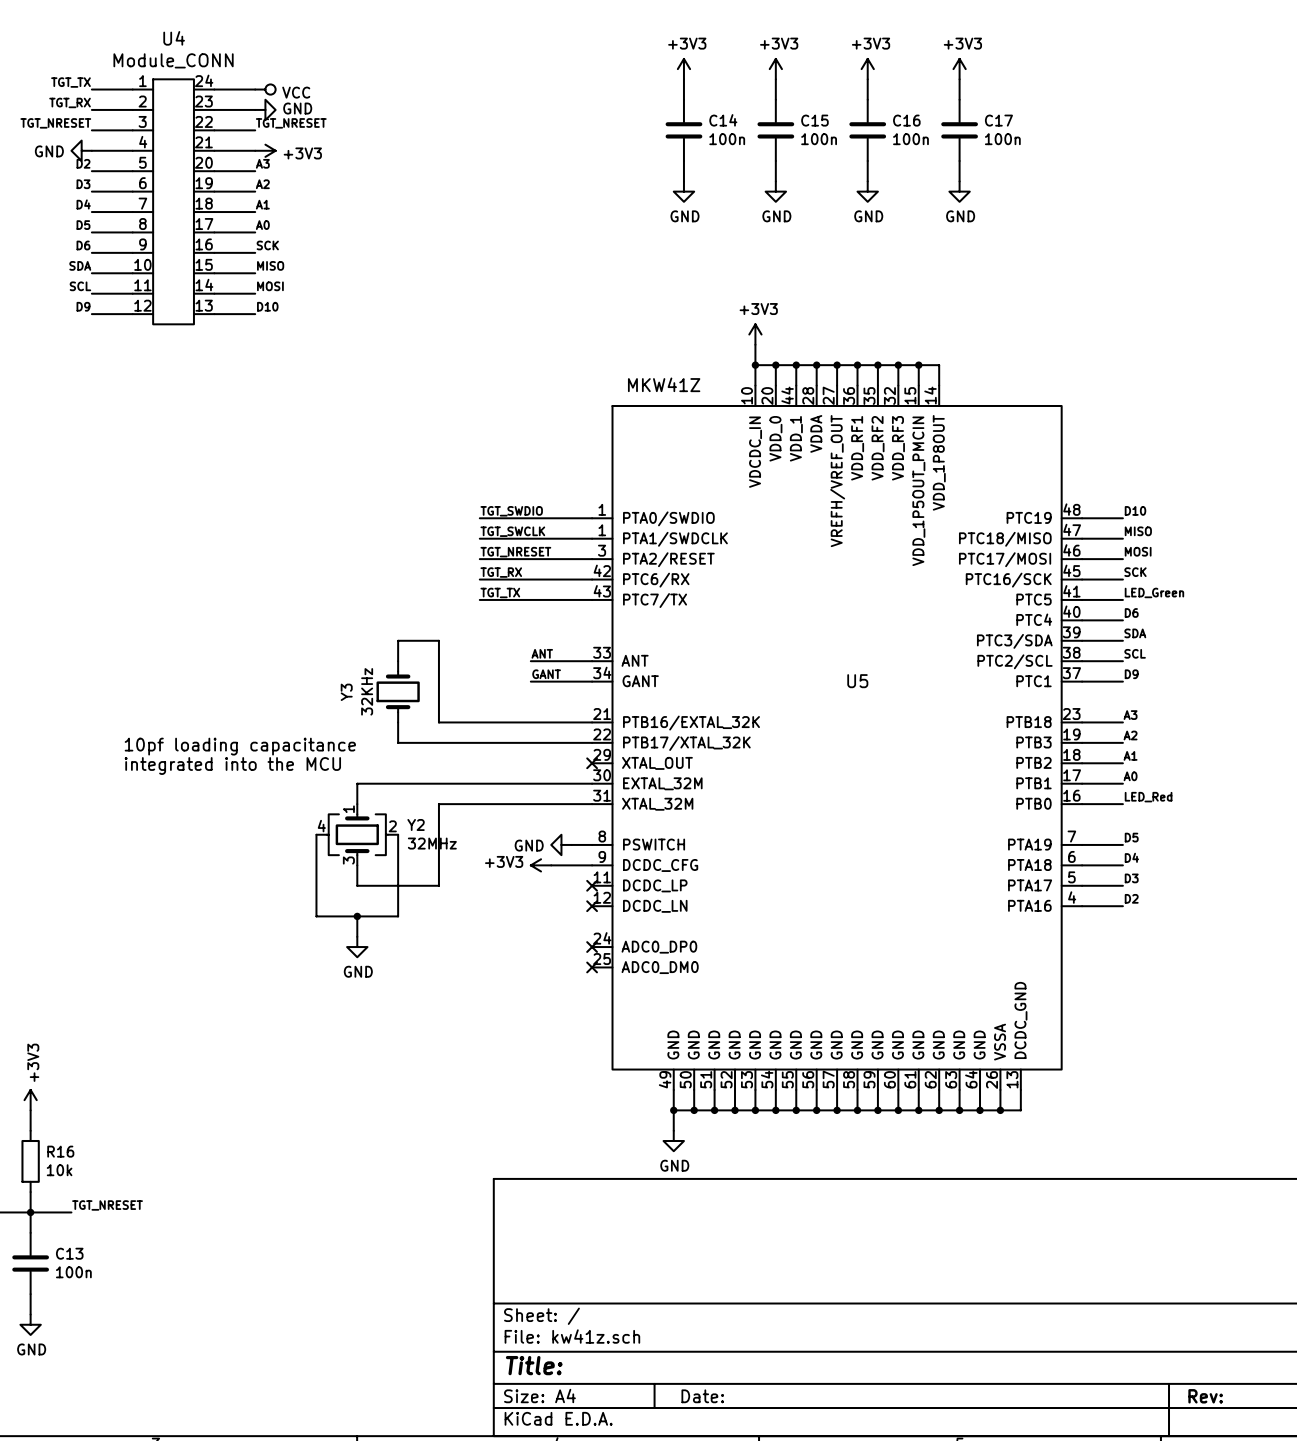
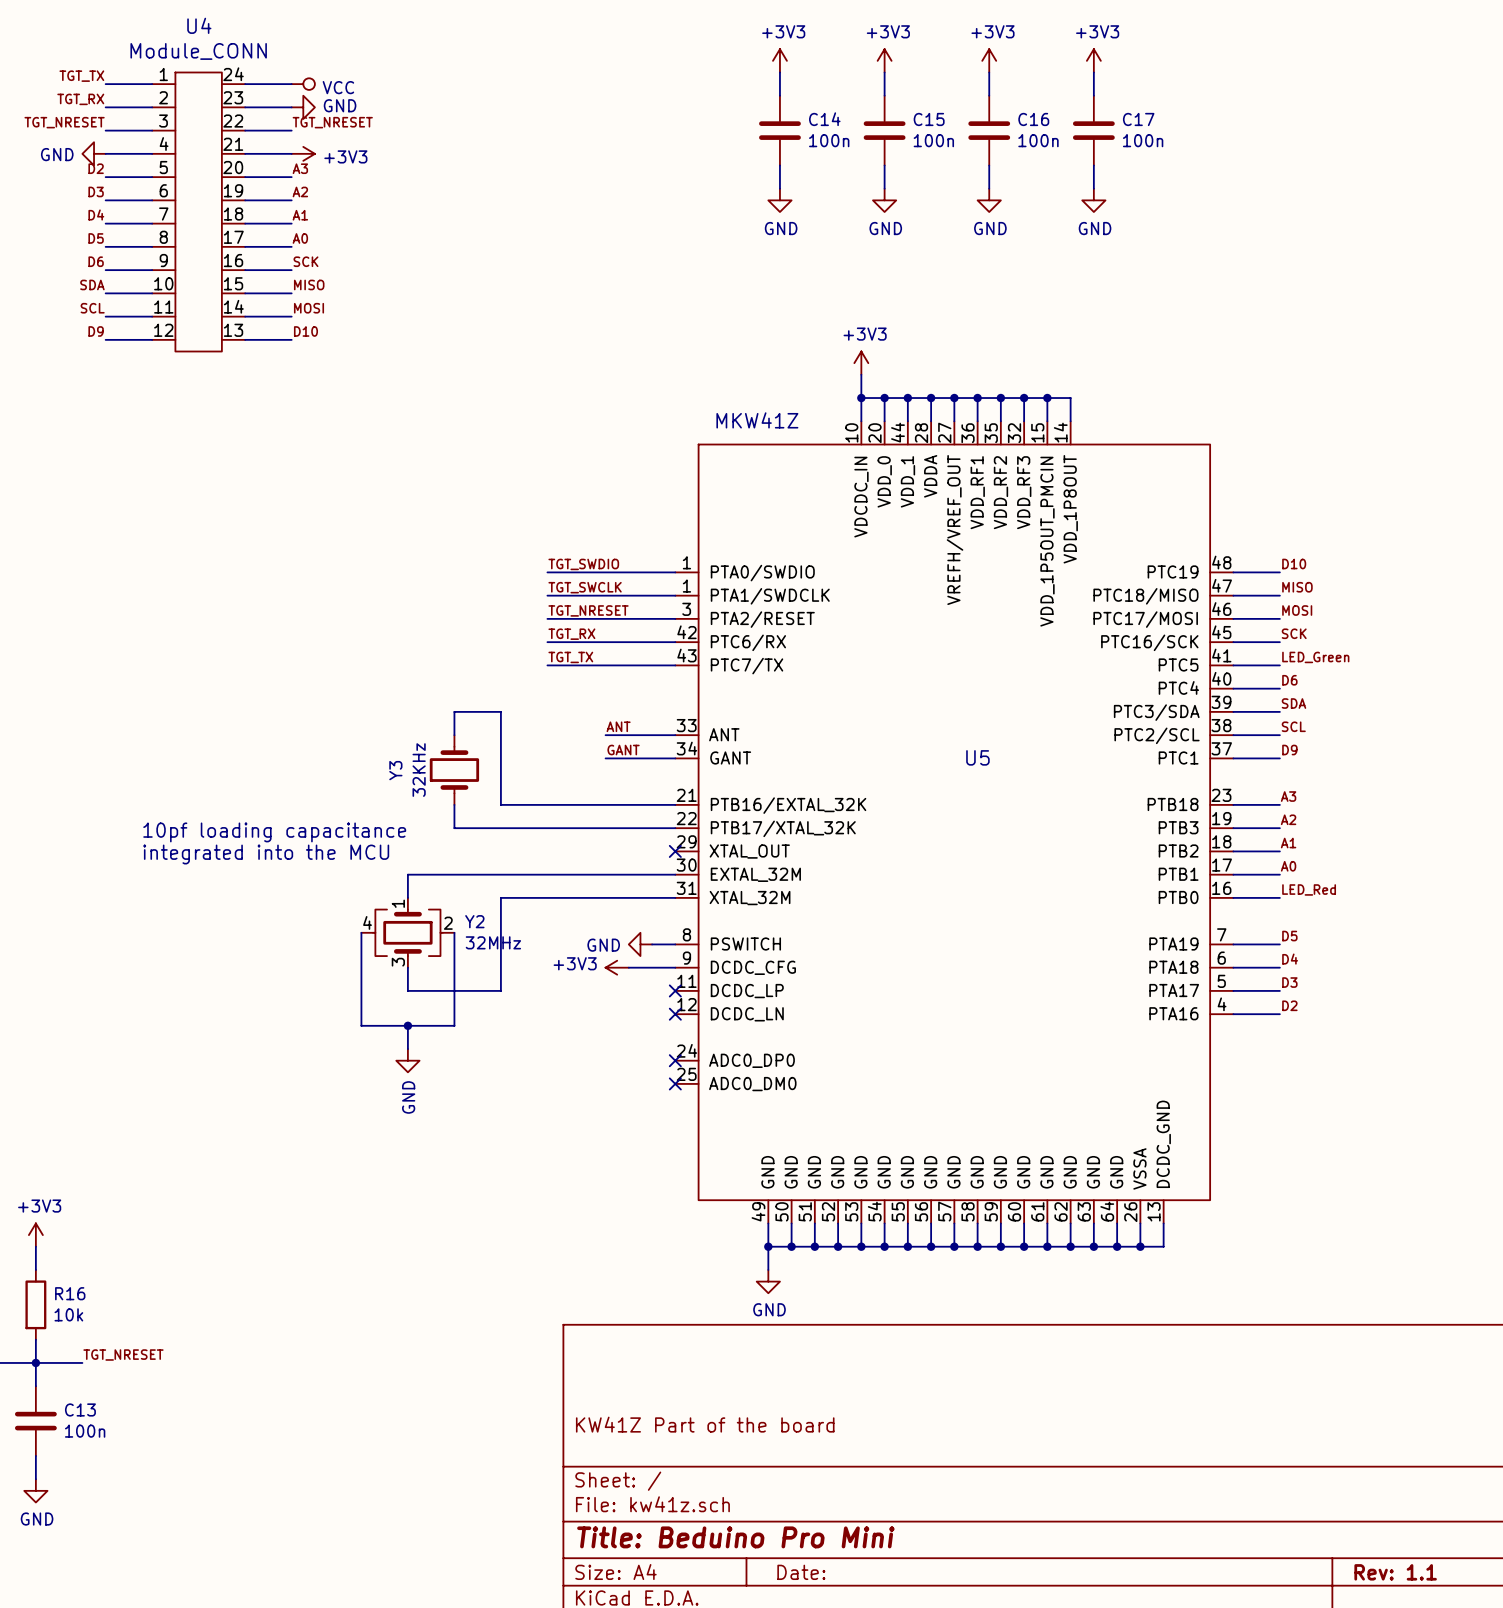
power symbol text rotation: 0° (358, 971) -> 90° counterclockwise (408, 1097)
power symbol text rotation: 0° (33, 1062) -> 90° clockwise (39, 1206)
title block: none -> KW41Z Part of the board (705, 1424)
title block: Title: (534, 1365) -> Title: Beduino Pro Mini (735, 1537)
title block: Rev: (1205, 1396) -> Rev: 1.1 (1395, 1572)

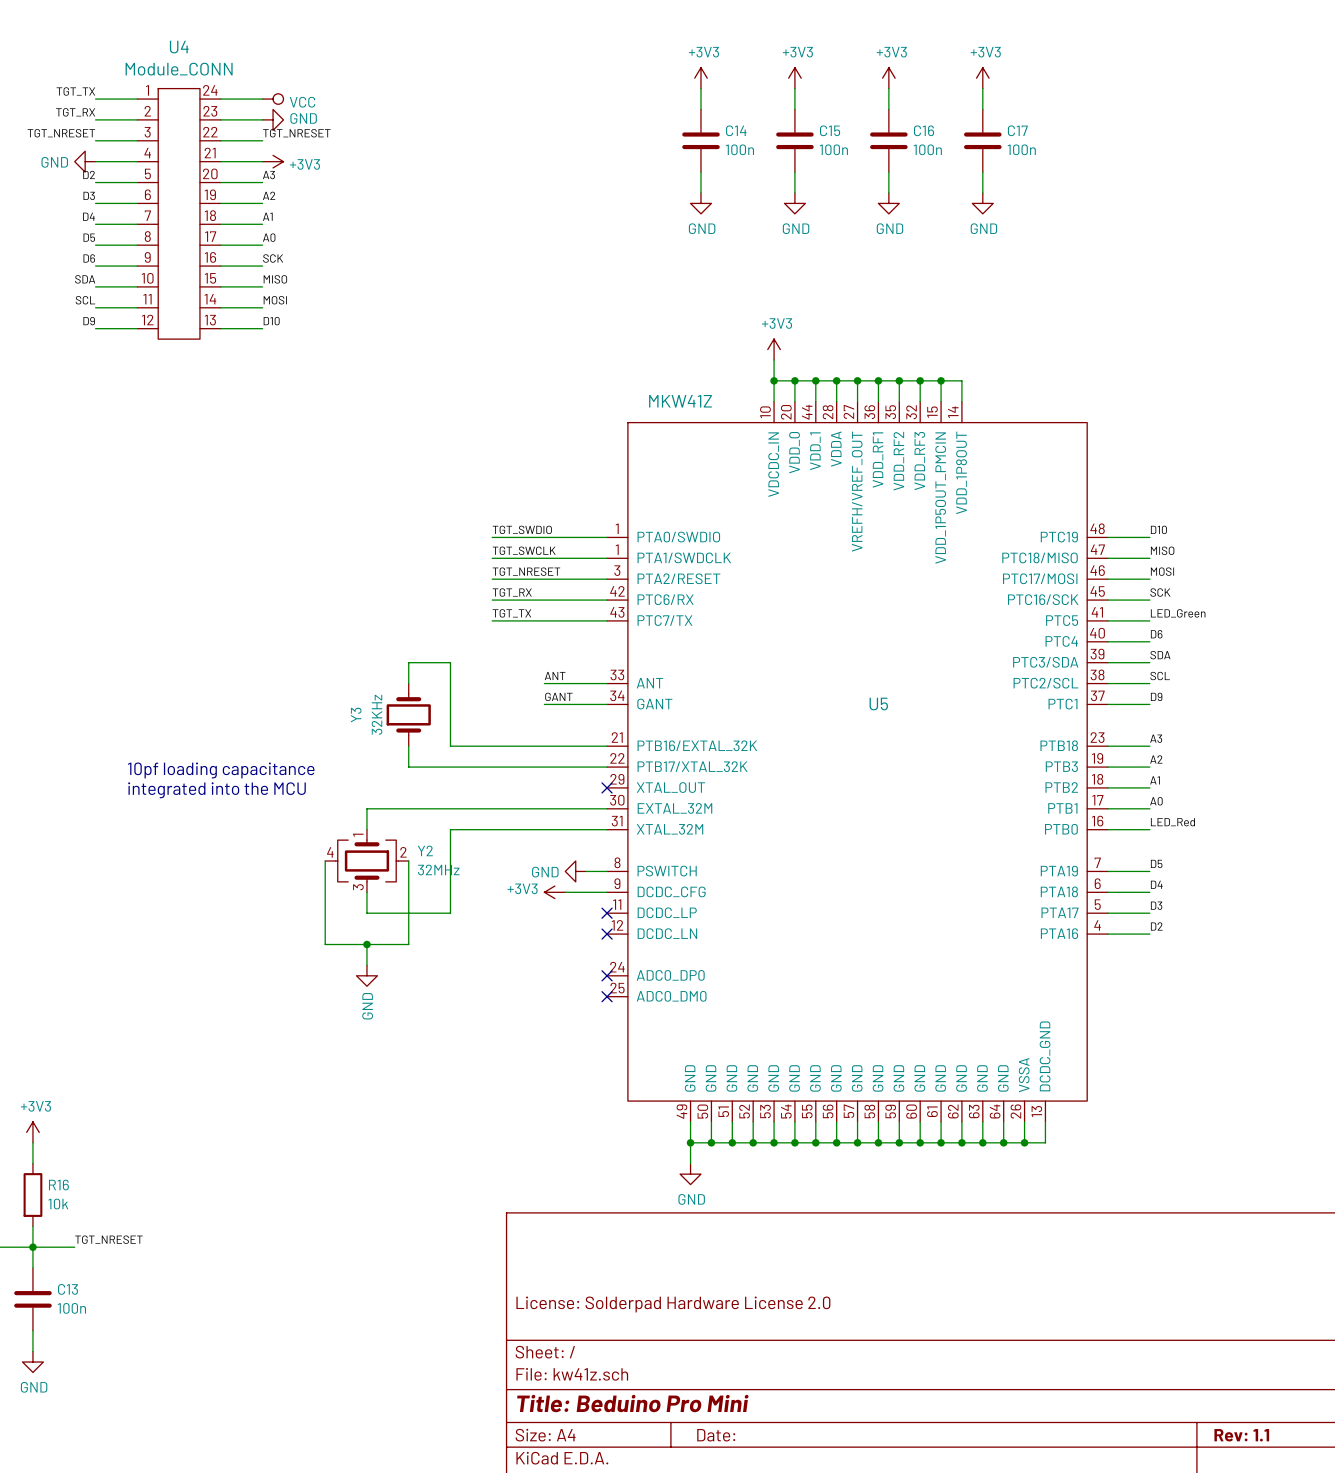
title block: KW41Z Part of the board (705, 1424) -> License: Solderpad Hardware License 2.0 (673, 1304)

